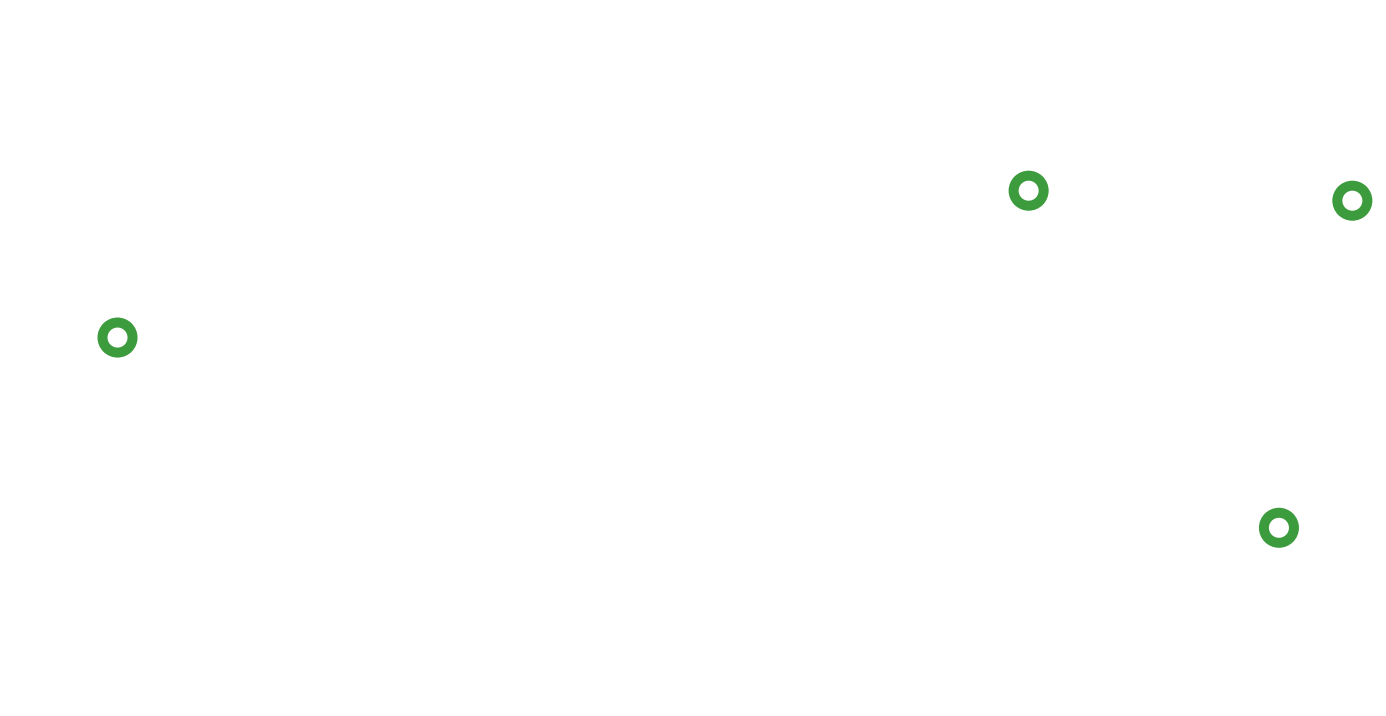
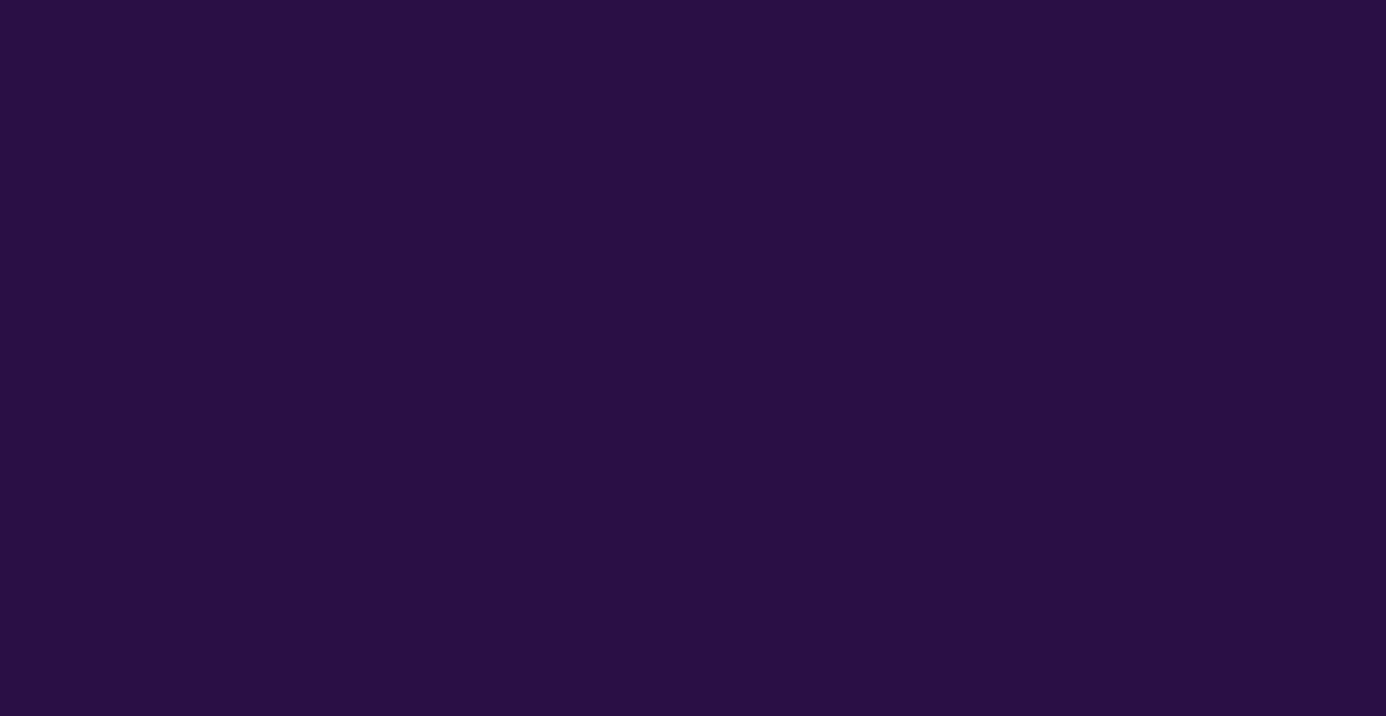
via: (1028, 190) -> none
via: (1352, 200) -> none
via: (117, 337) -> none
via: (1278, 527) -> none

